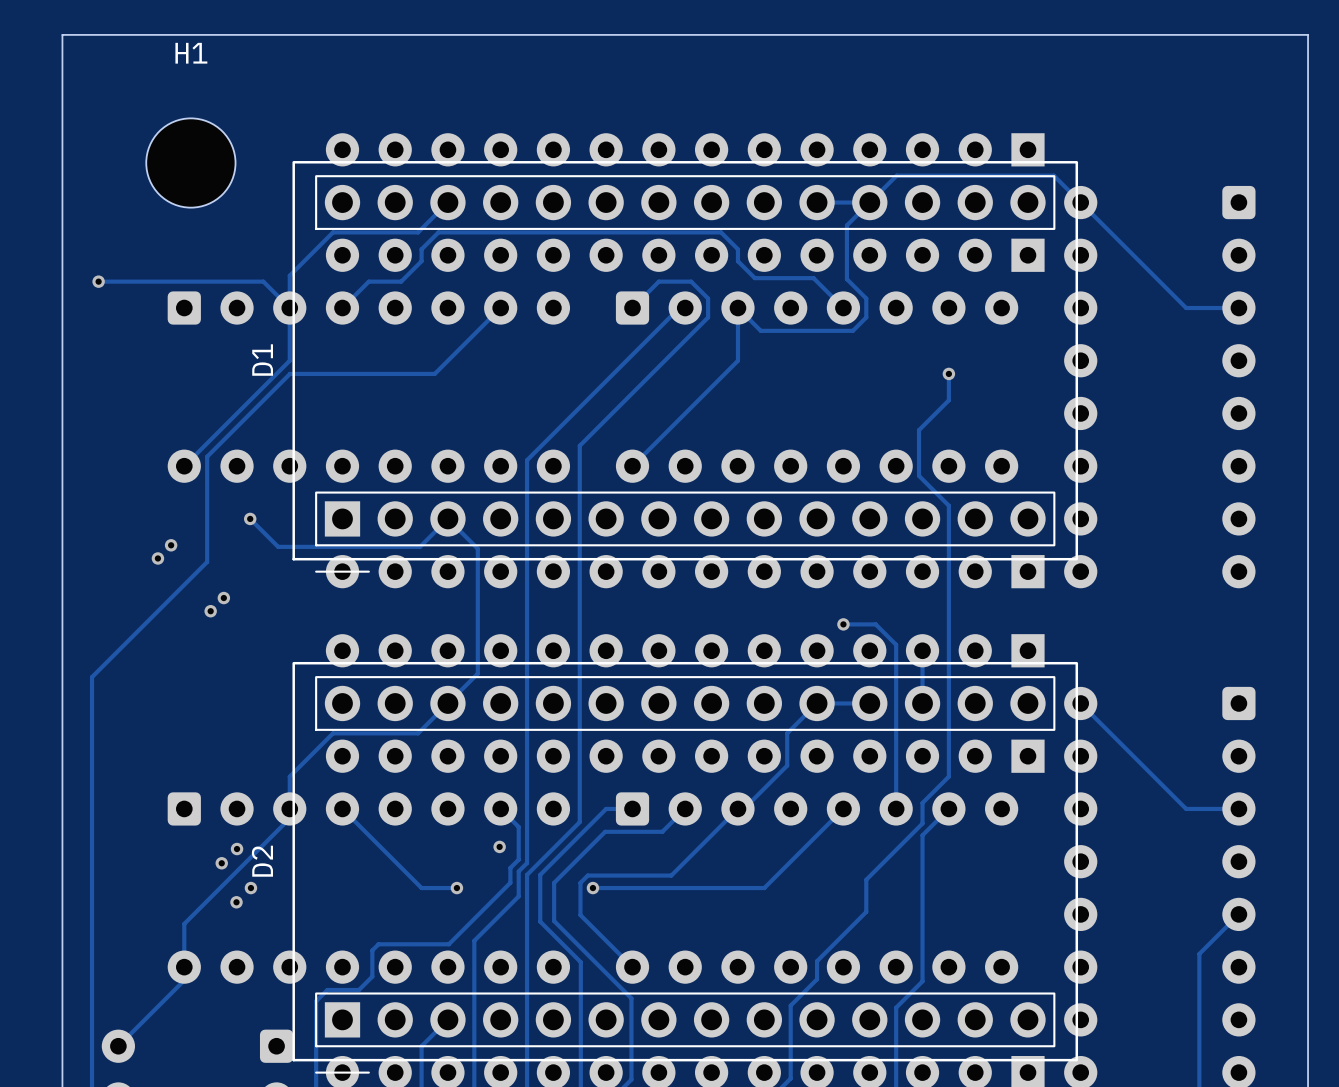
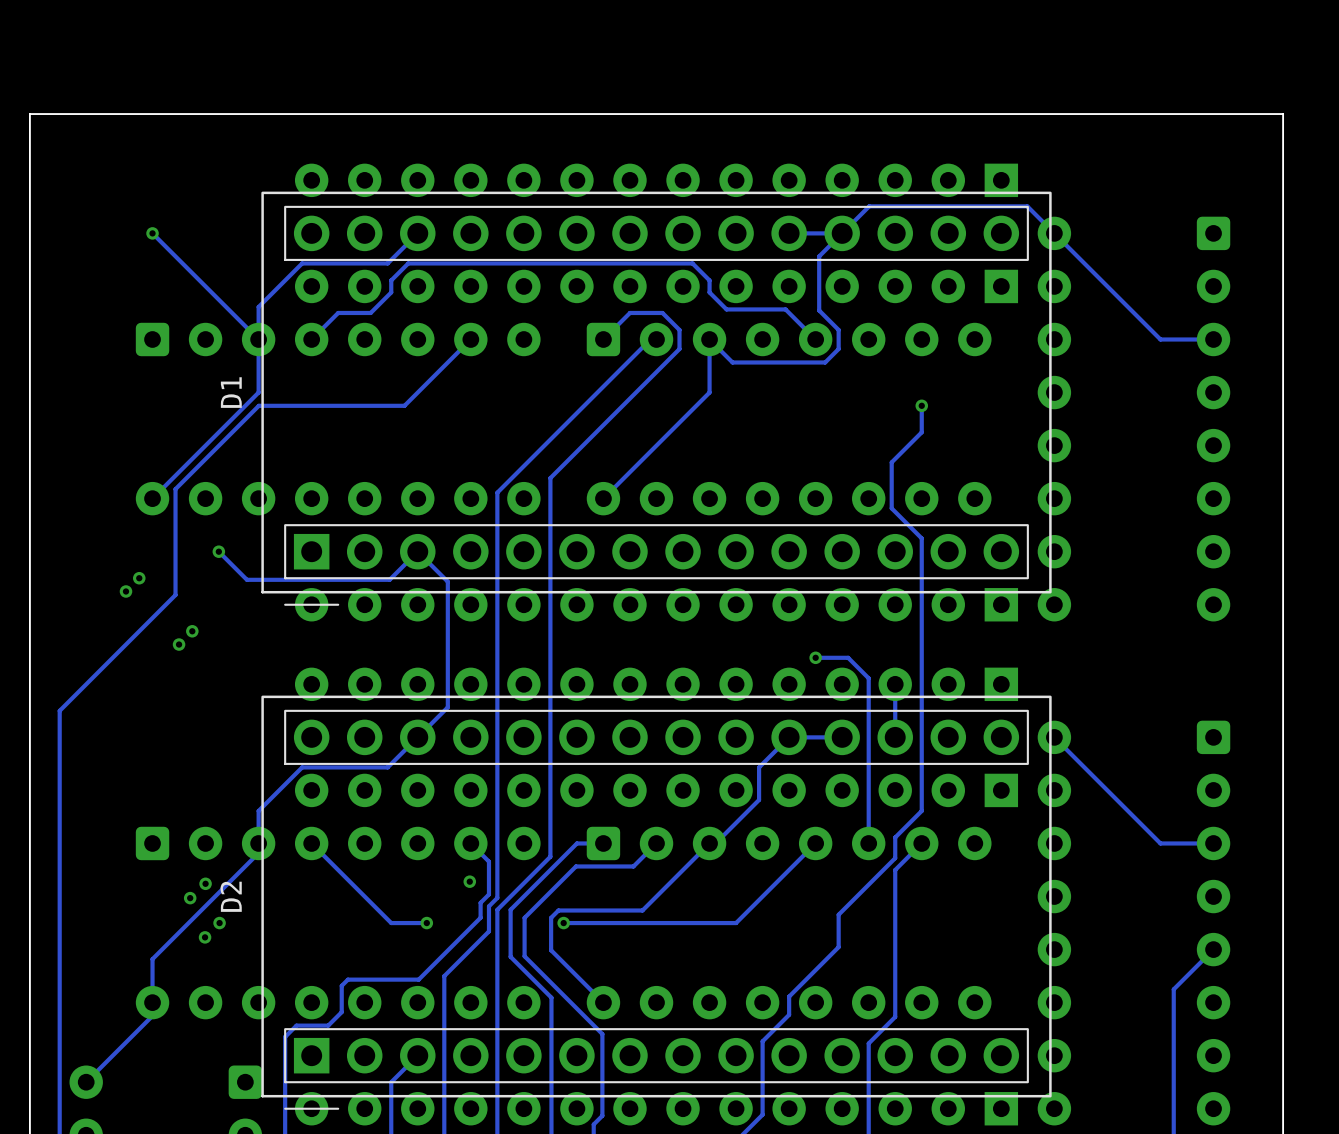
board edge: (1308, 83) (1308, 34) (62, 34) (62, 83) -> (1283, 114) (29, 114)
H1: (190, 163) -> none
via position: (98, 281) -> (152, 233)
track: (263, 281) (98, 281) -> (232, 312) (152, 233)

